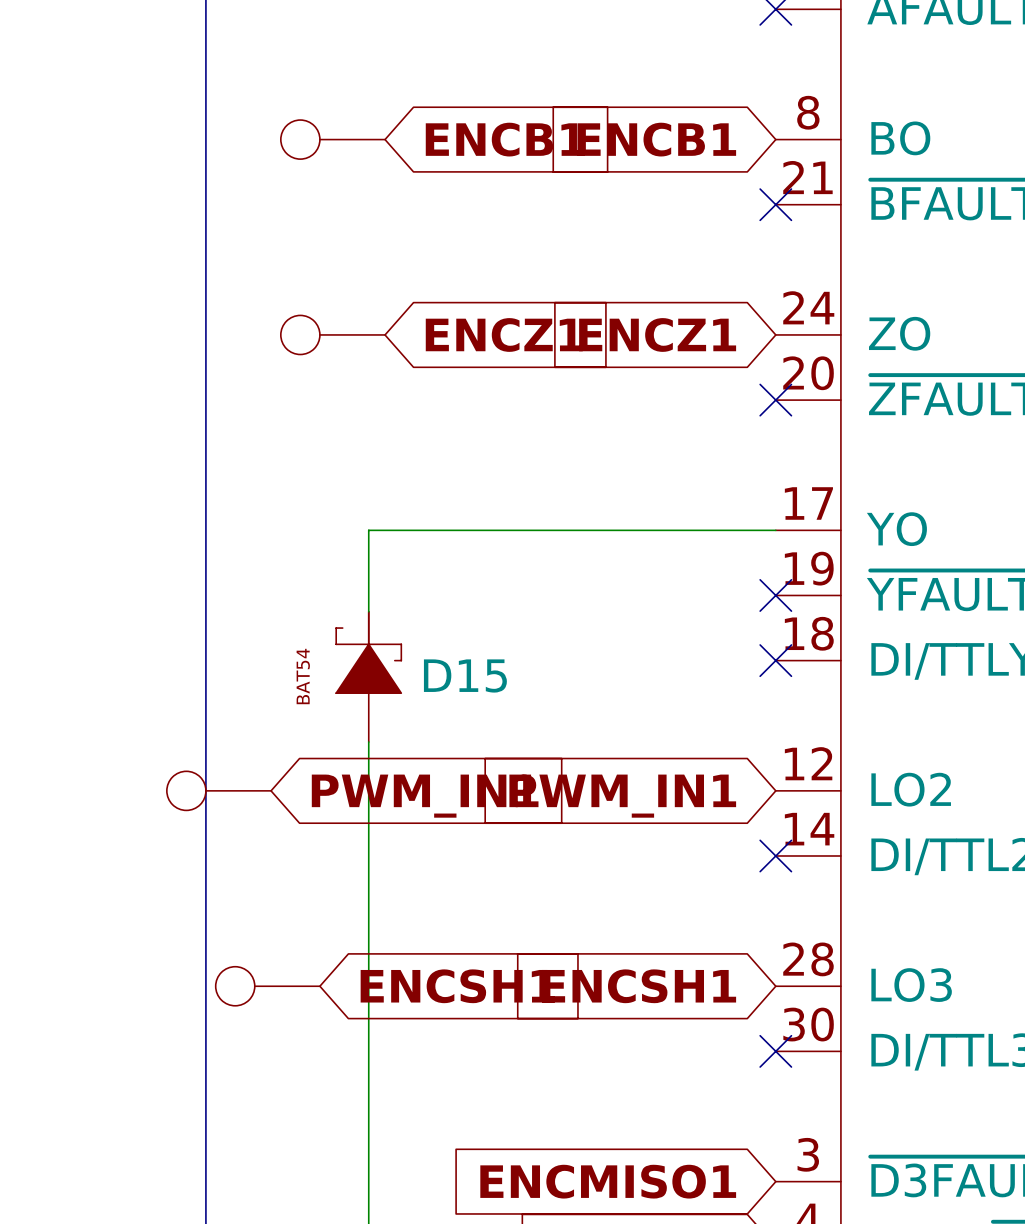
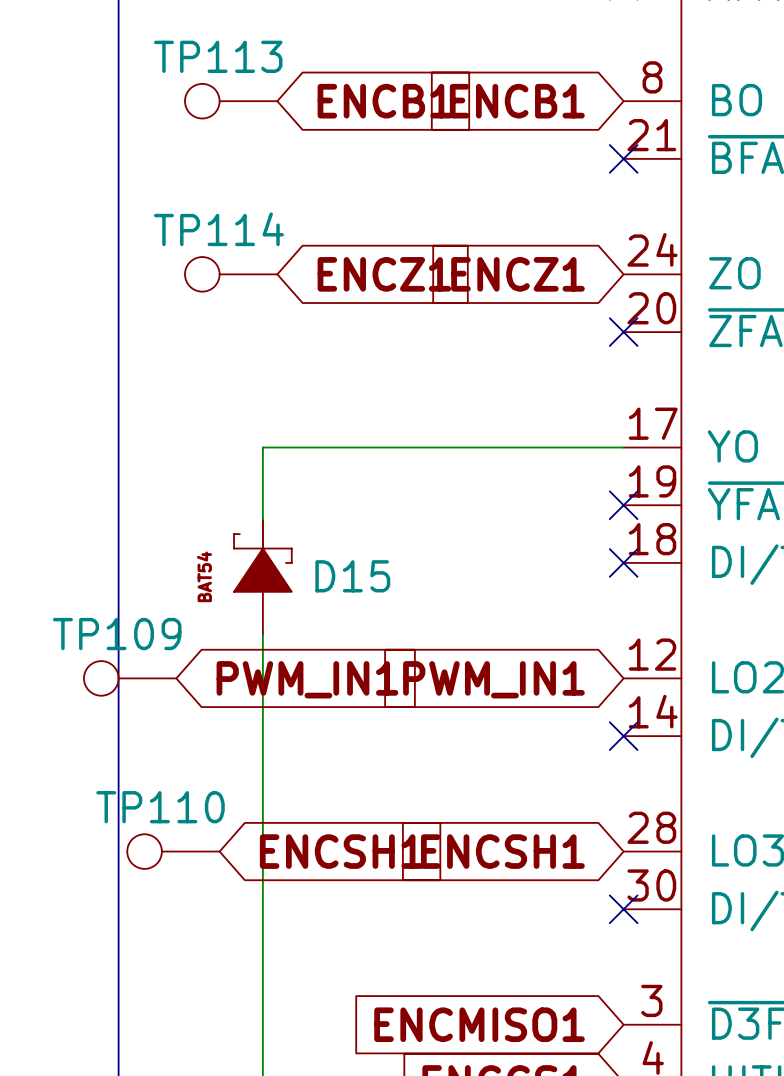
TP113 name: none -> TP113 (218, 56)
TP114 name: none -> TP114 (218, 229)
TP109 name: none -> TP109 (117, 634)
TP110 name: none -> TP110 (160, 807)

